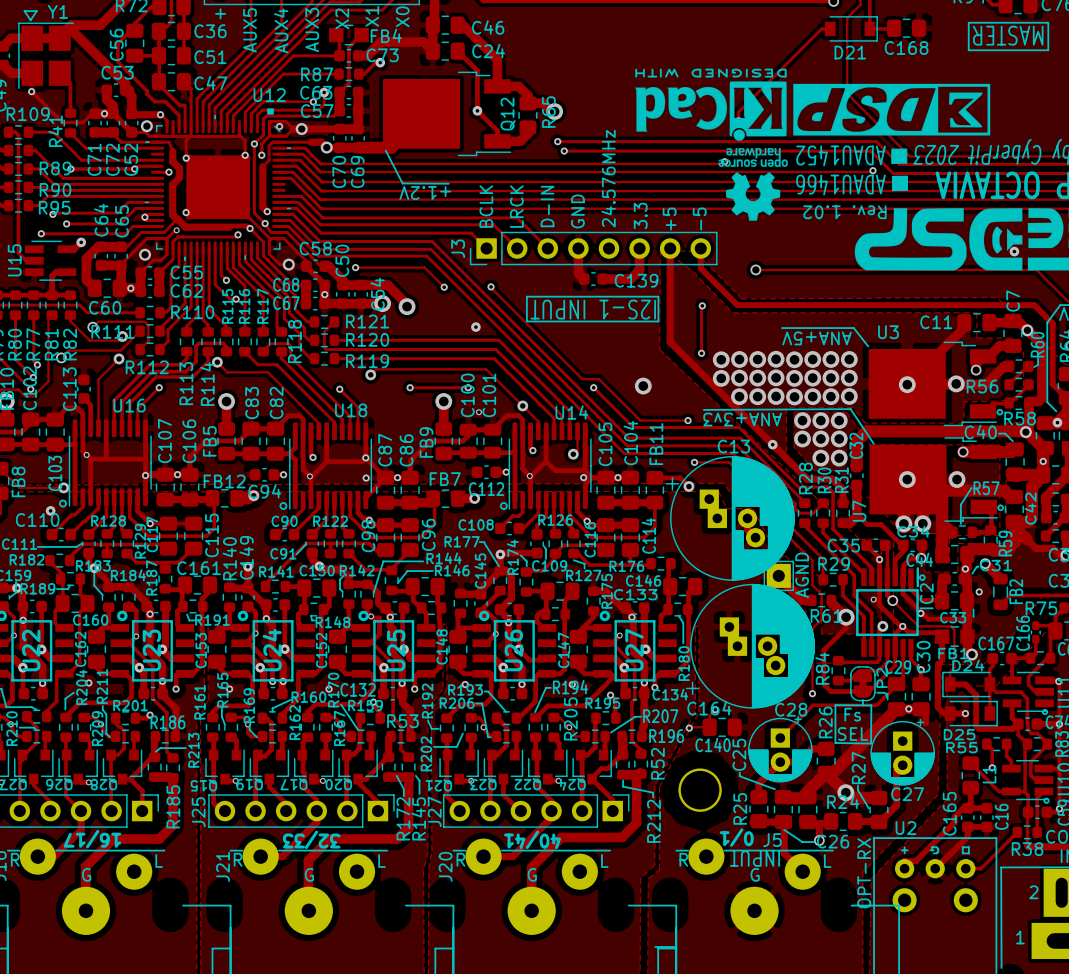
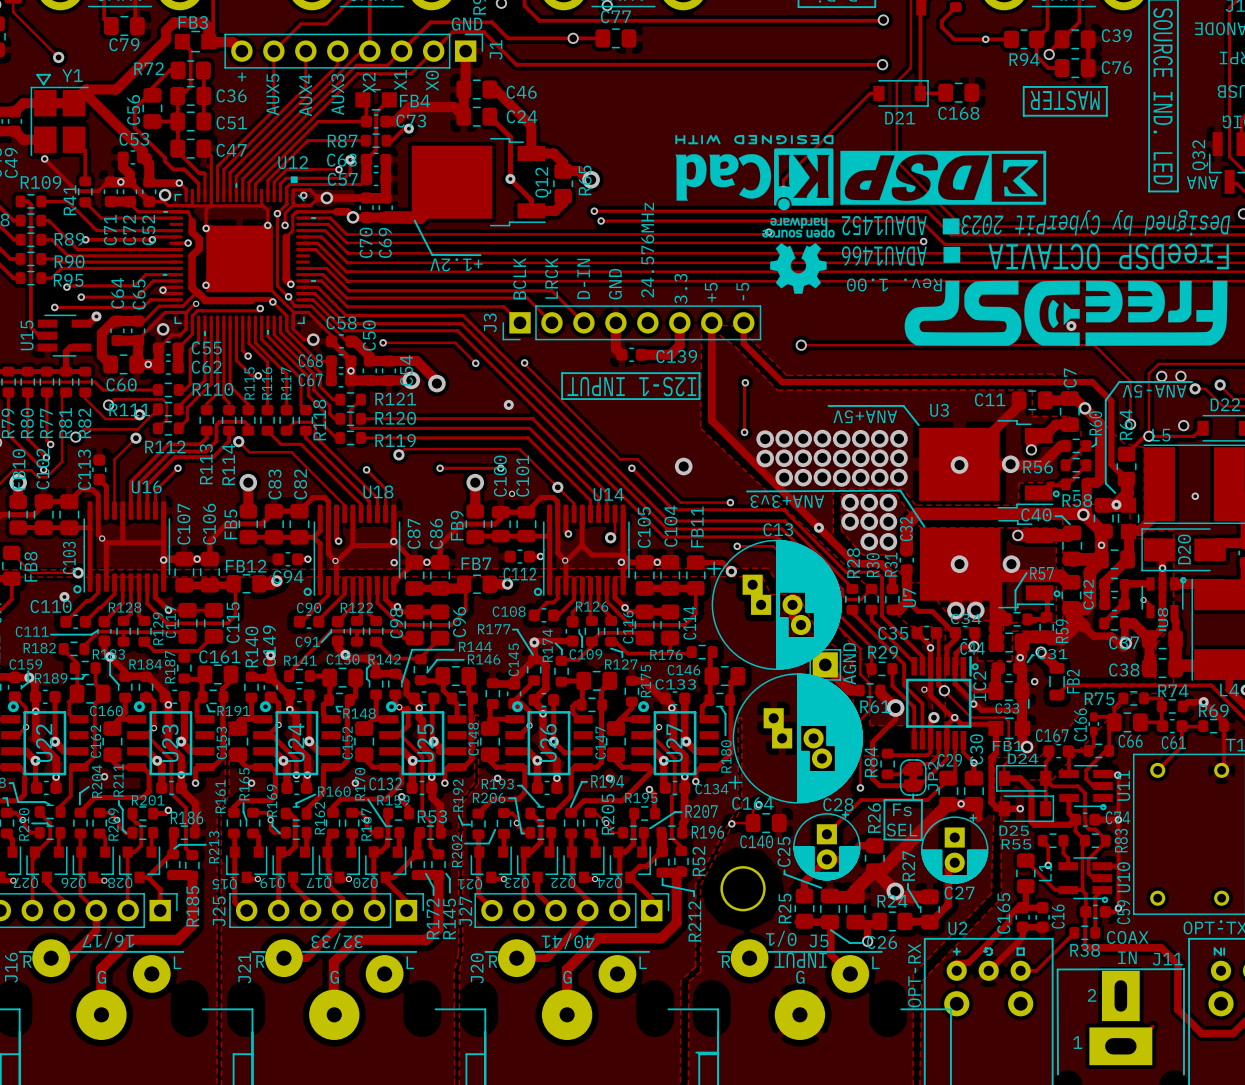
text: Rev. 1.02 (844, 212) -> Rev. 1.00 (894, 284)

